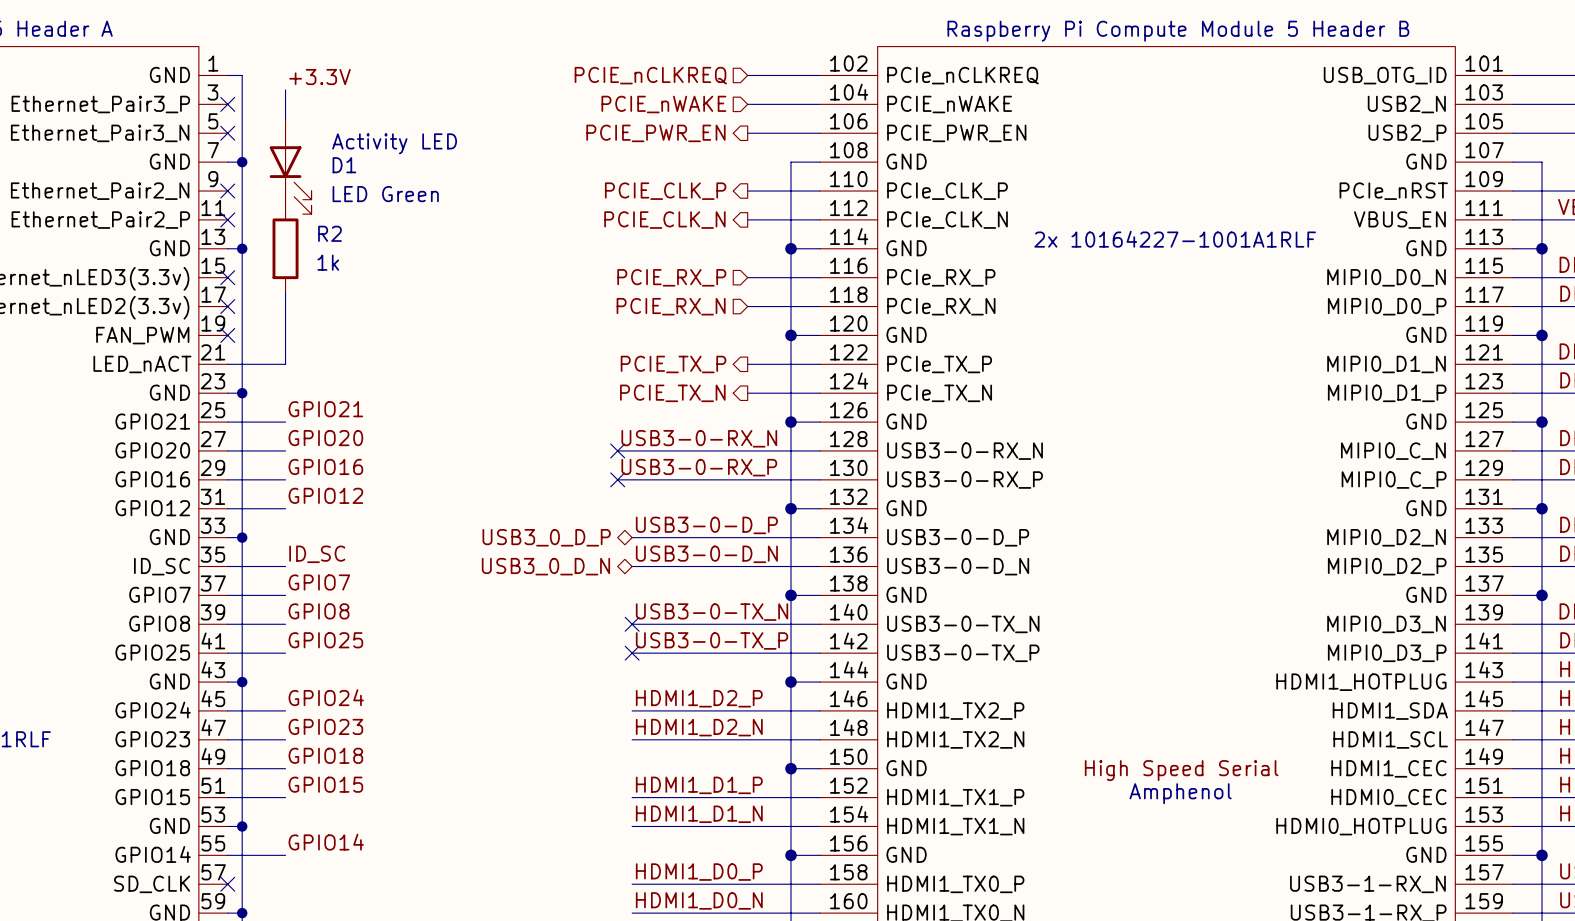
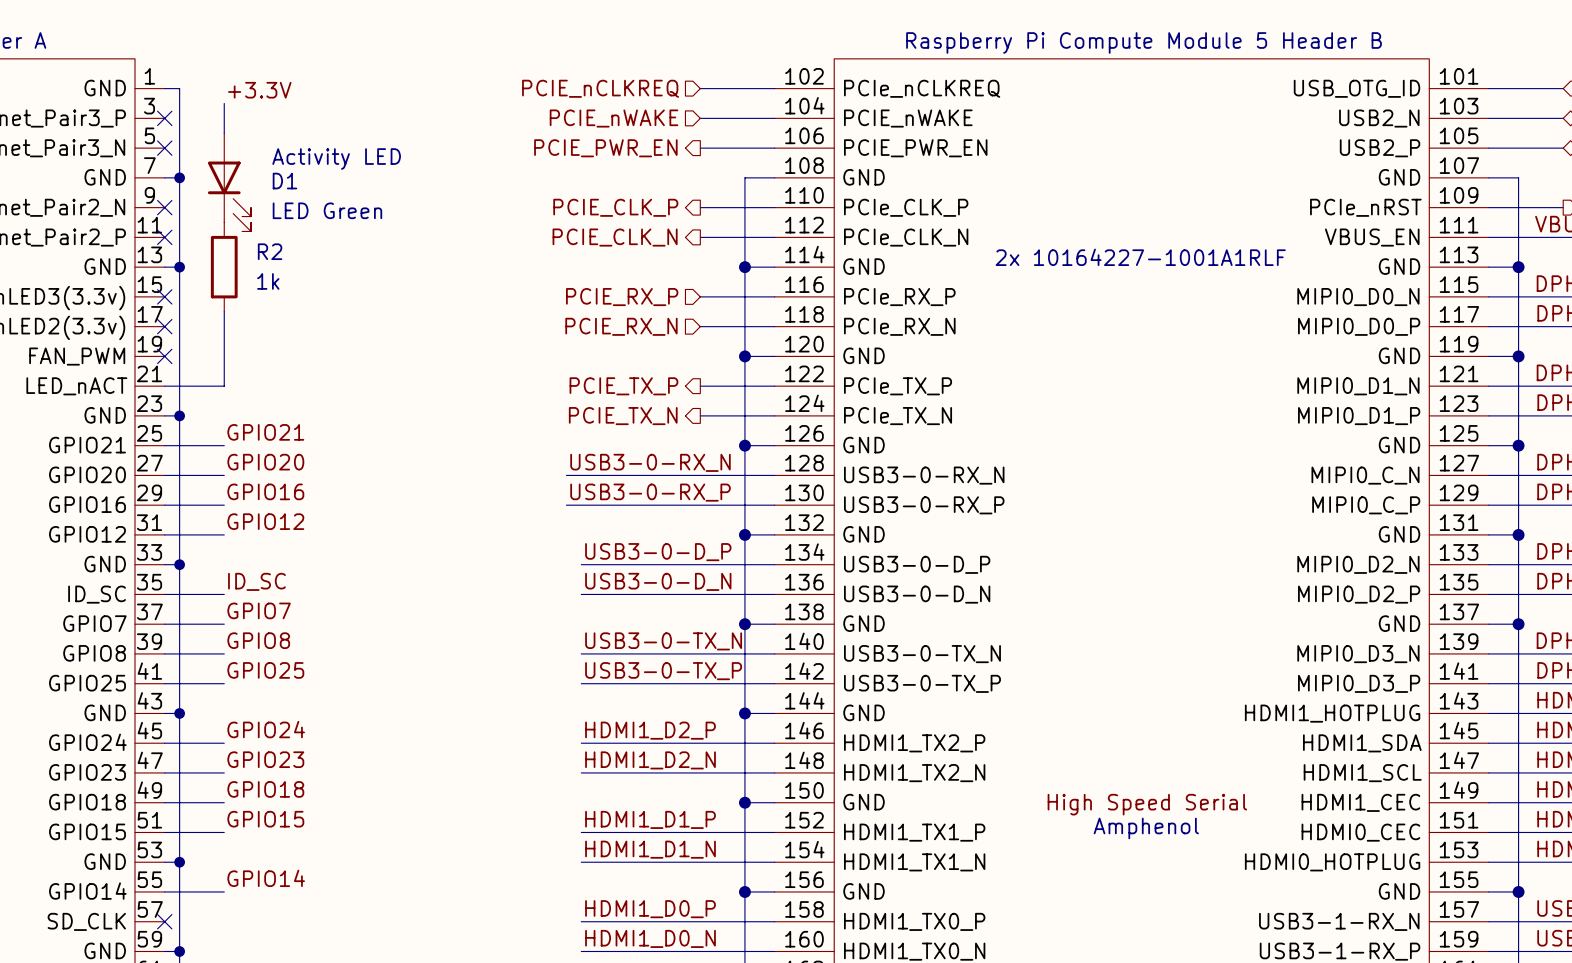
no-connect mark: (617, 450) -> none
no-connect mark: (617, 479) -> none
hierarchical label: USB3_0_D_P (546, 537) -> none
hierarchical label: USB3_0_D_N (545, 566) -> none
no-connect mark: (632, 624) -> none
no-connect mark: (632, 653) -> none

